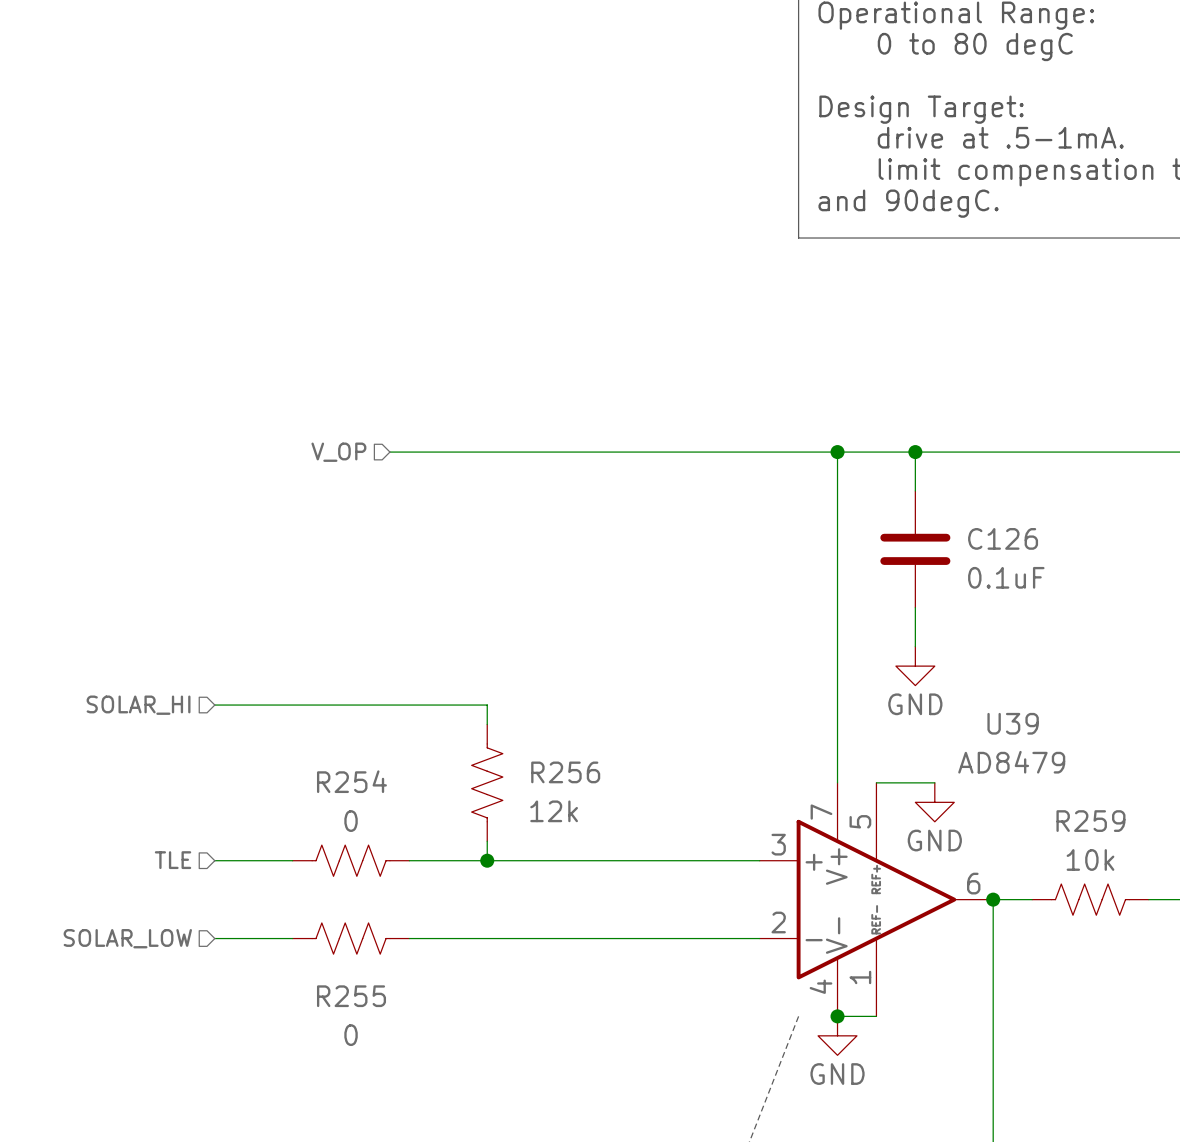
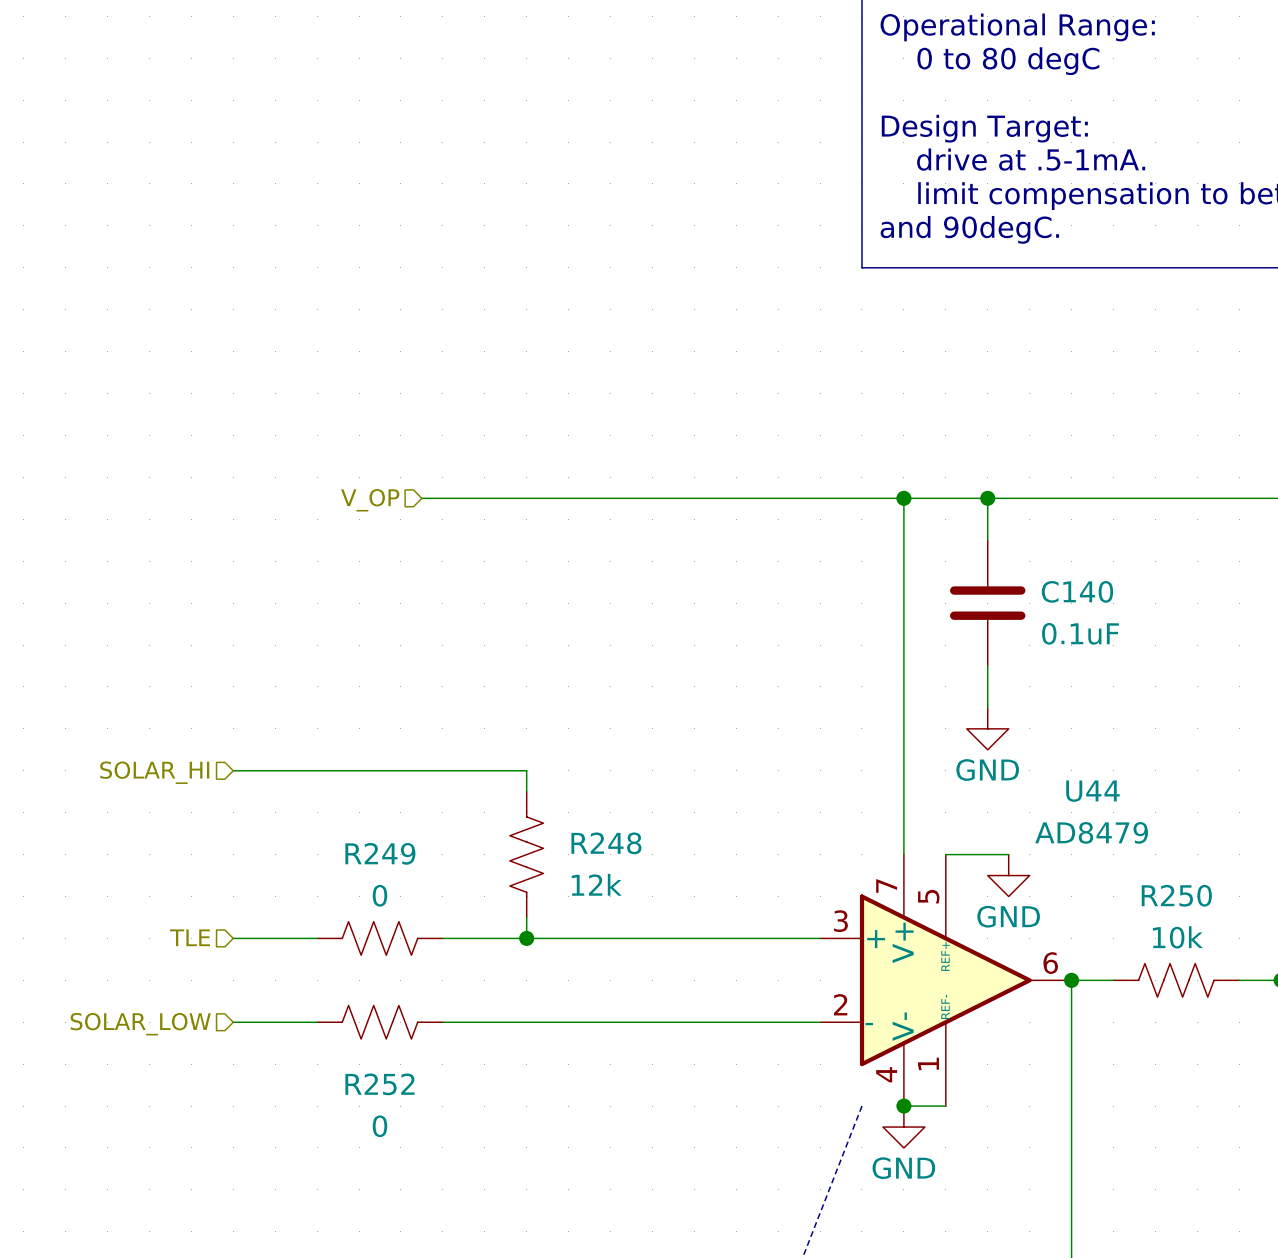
C126 name: C126 (1003, 538) -> C140 (1077, 591)
U39 name: U39 (1013, 723) -> U44 (1092, 791)
R256 name: R256 (565, 772) -> R248 (606, 843)
R254 name: R254 (351, 781) -> R249 (380, 853)
R259 name: R259 (1090, 821) -> R250 (1176, 895)
R255 name: R255 (351, 996) -> R252 (379, 1084)

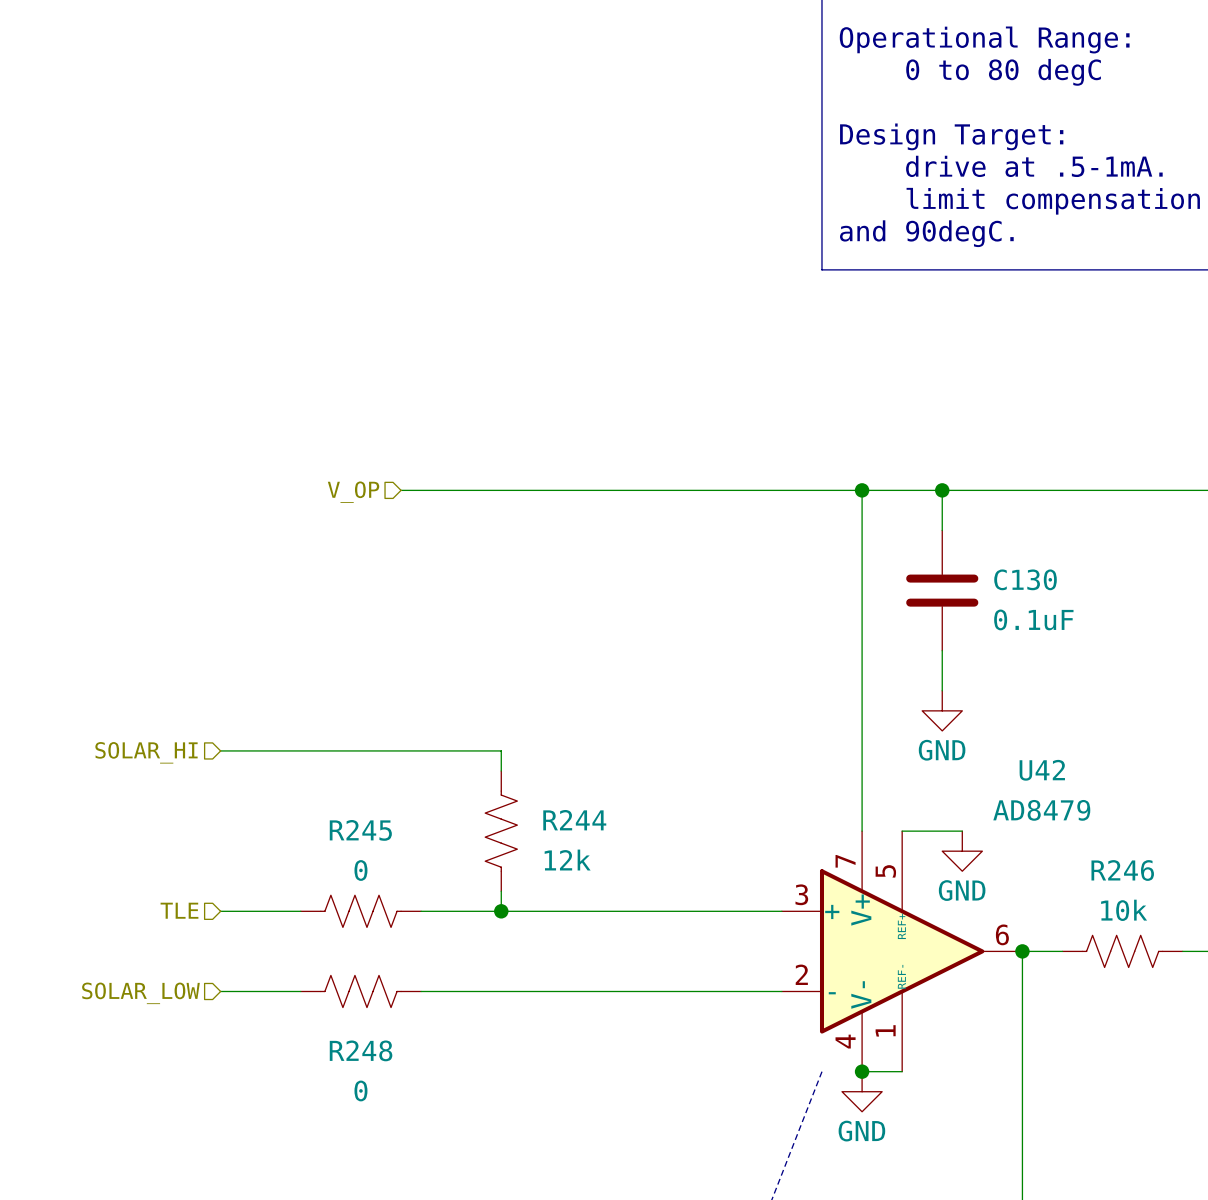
C140 name: C140 (1077, 591) -> C130 (1025, 579)
U44 name: U44 (1092, 791) -> U42 (1042, 770)
R248 name: R248 (606, 843) -> R244 (574, 820)
R249 name: R249 (380, 853) -> R245 (360, 830)
R250 name: R250 (1176, 895) -> R246 (1122, 870)
R252 name: R252 (379, 1084) -> R248 (361, 1050)

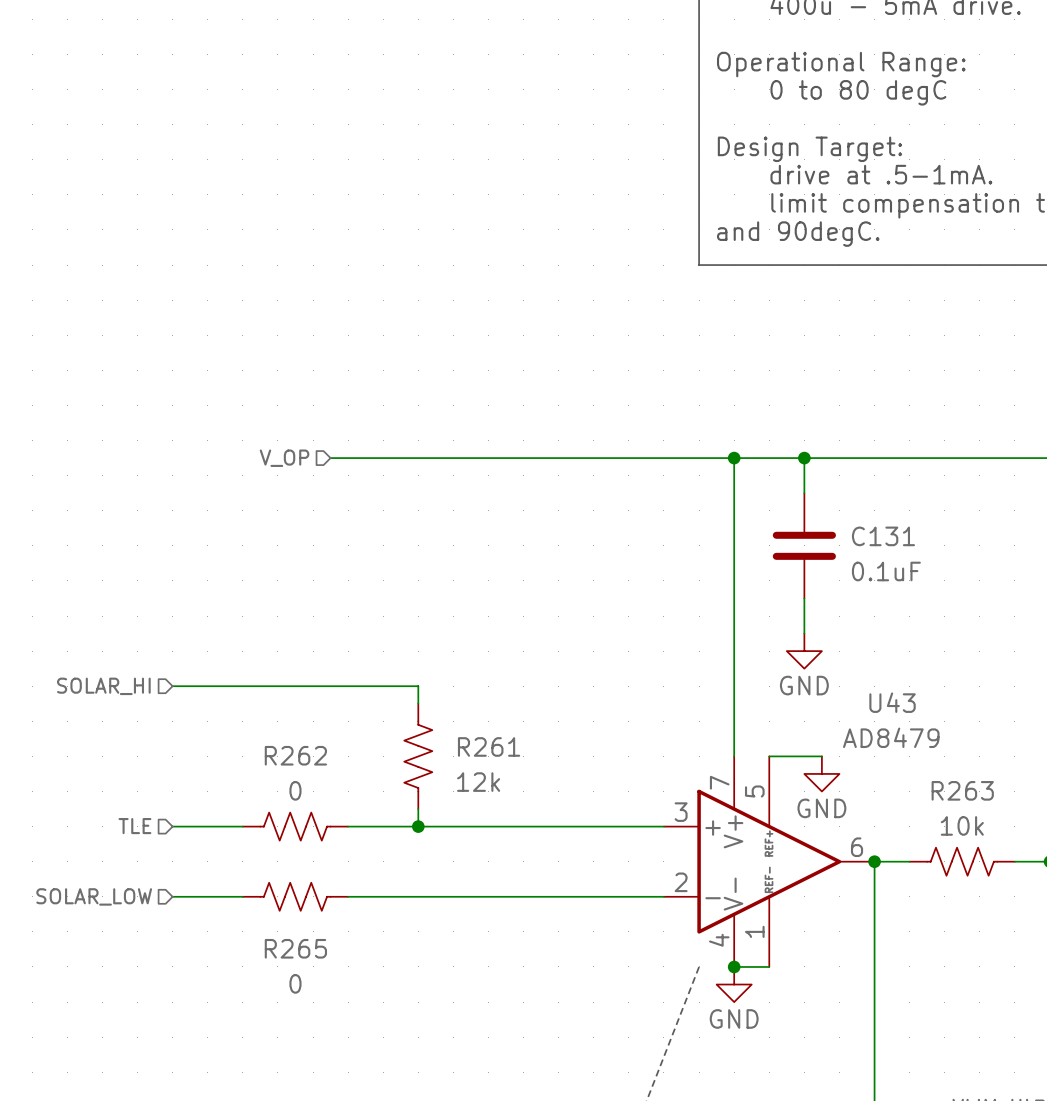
C130 name: C130 (1025, 579) -> C131 (883, 536)
U42 name: U42 (1042, 770) -> U43 (892, 702)
R244 name: R244 (574, 820) -> R261 (489, 746)
R245 name: R245 (360, 830) -> R262 (295, 755)
R246 name: R246 (1122, 870) -> R263 (962, 790)
R248 name: R248 (361, 1050) -> R265 (295, 948)

